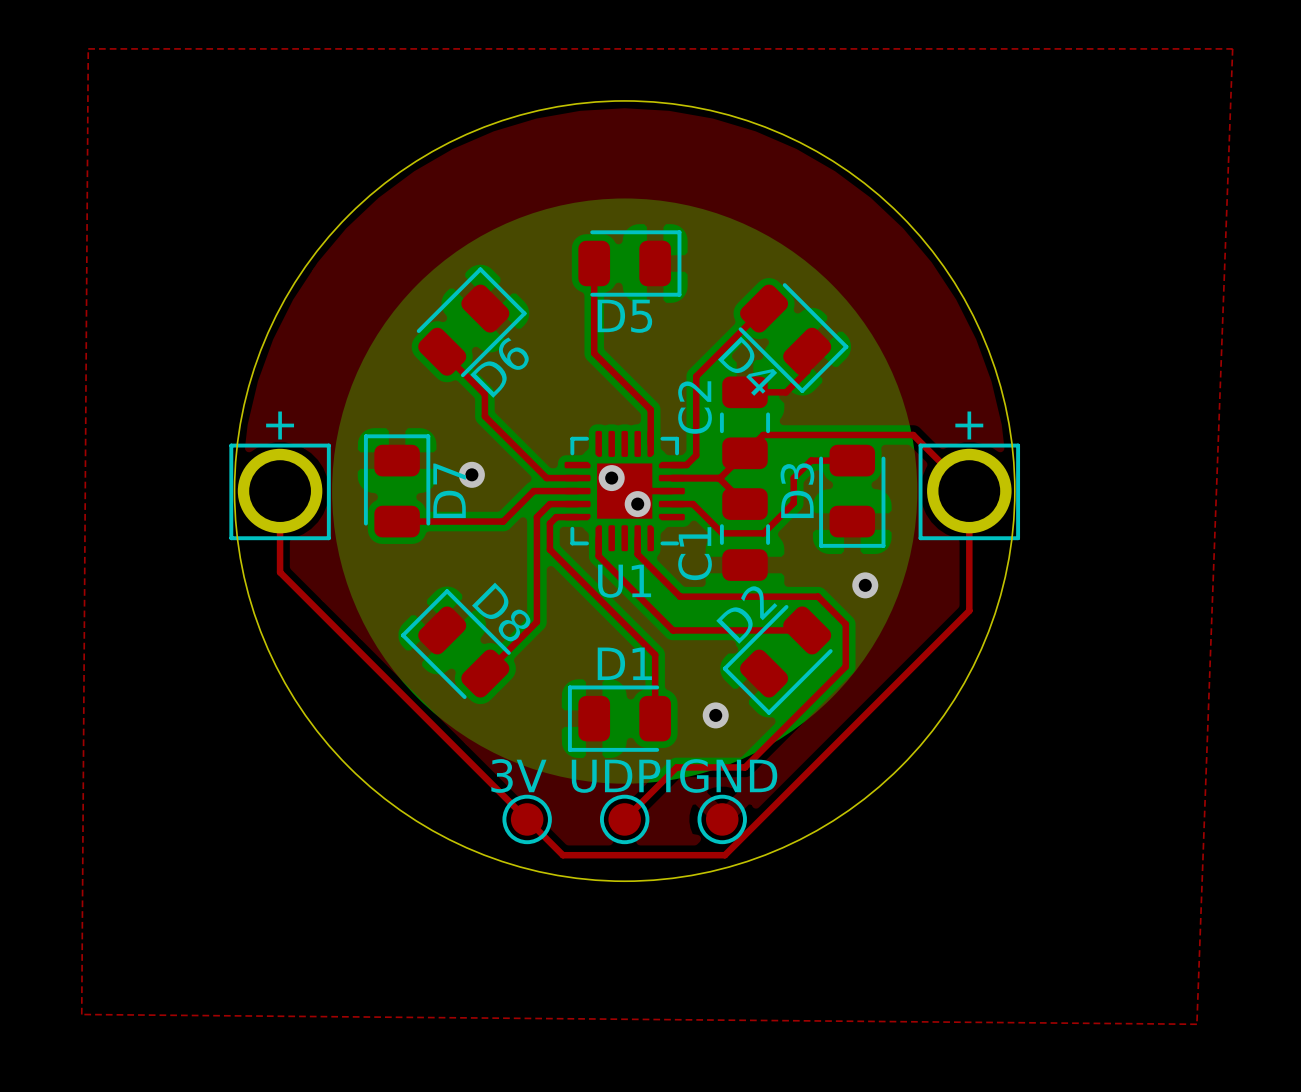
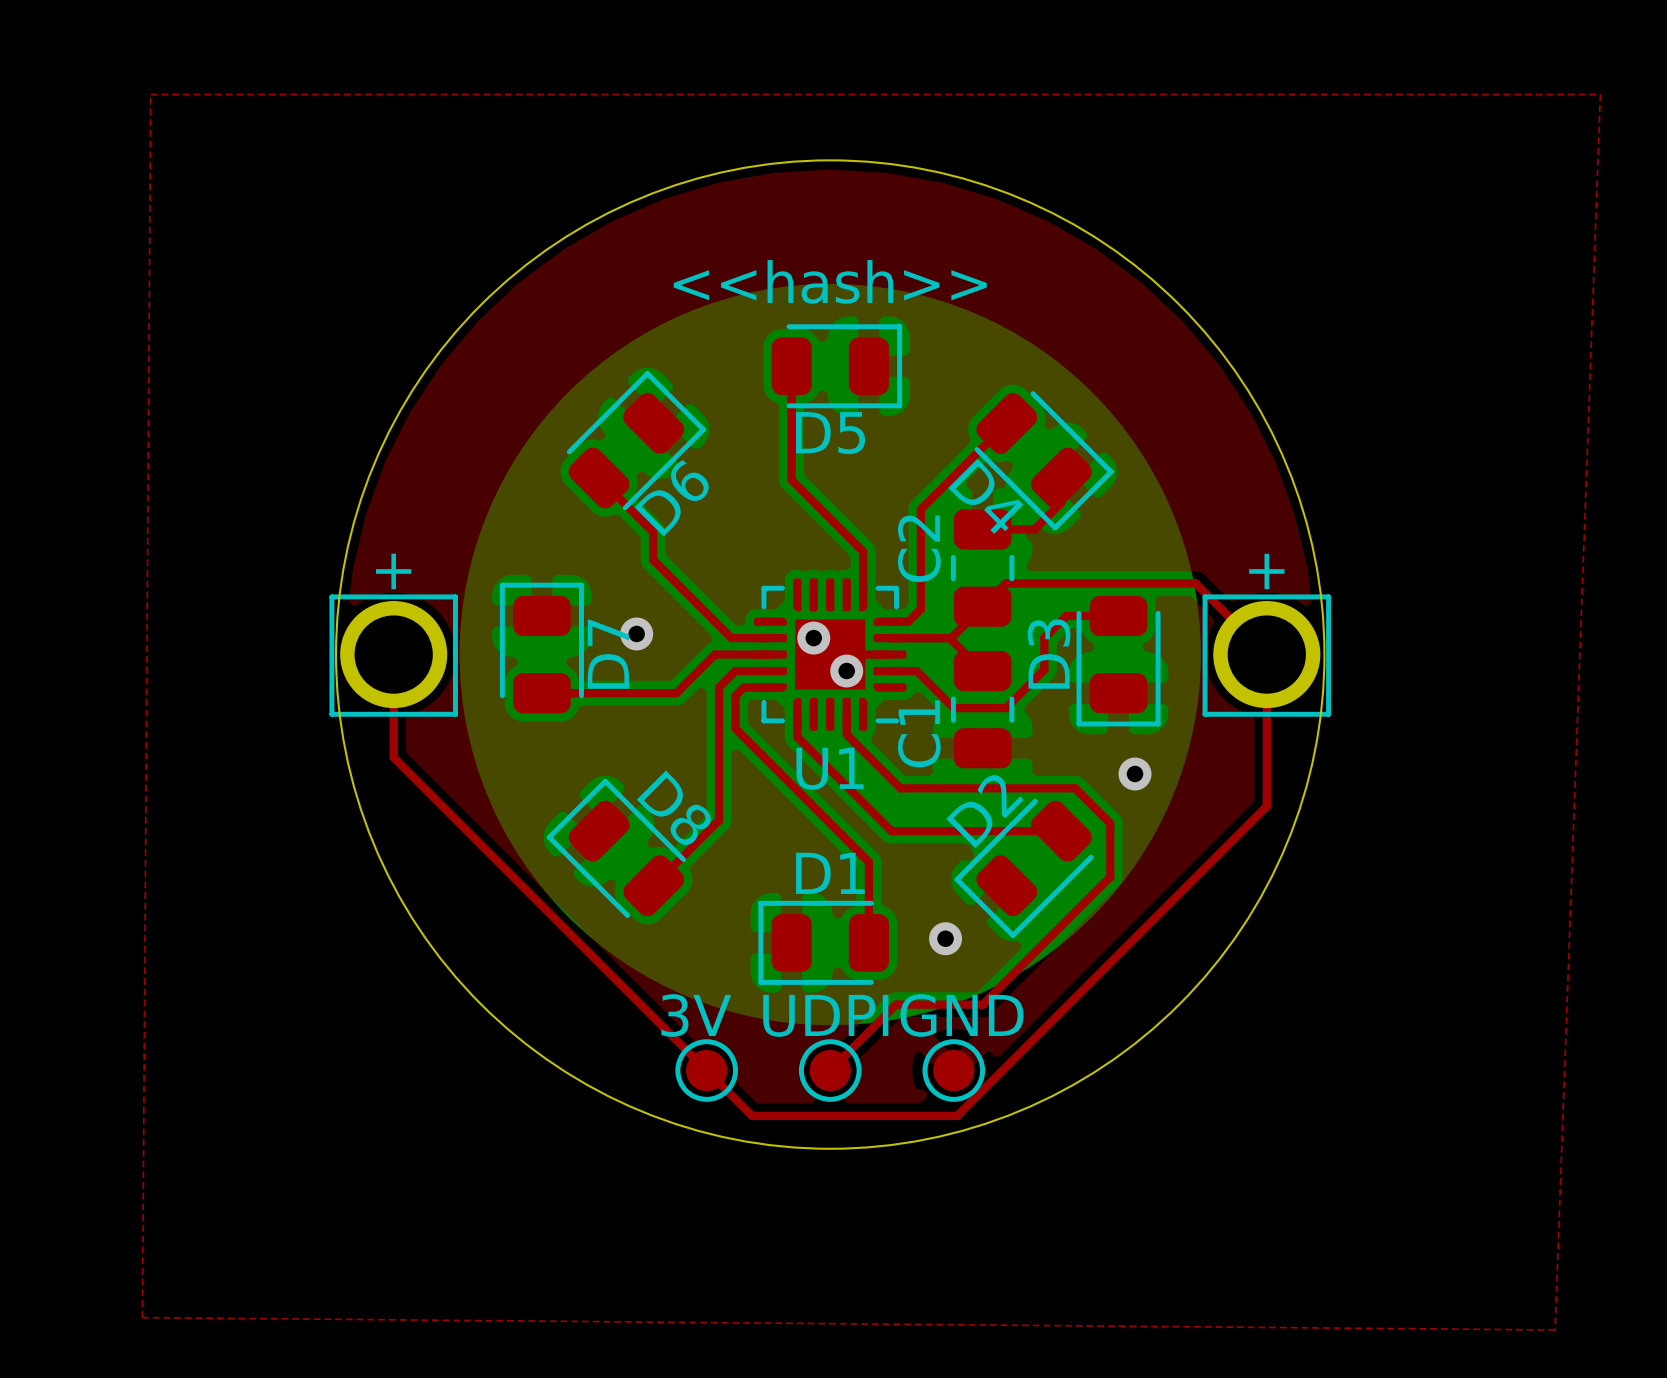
text: none -> <<hash>> (830, 281)

